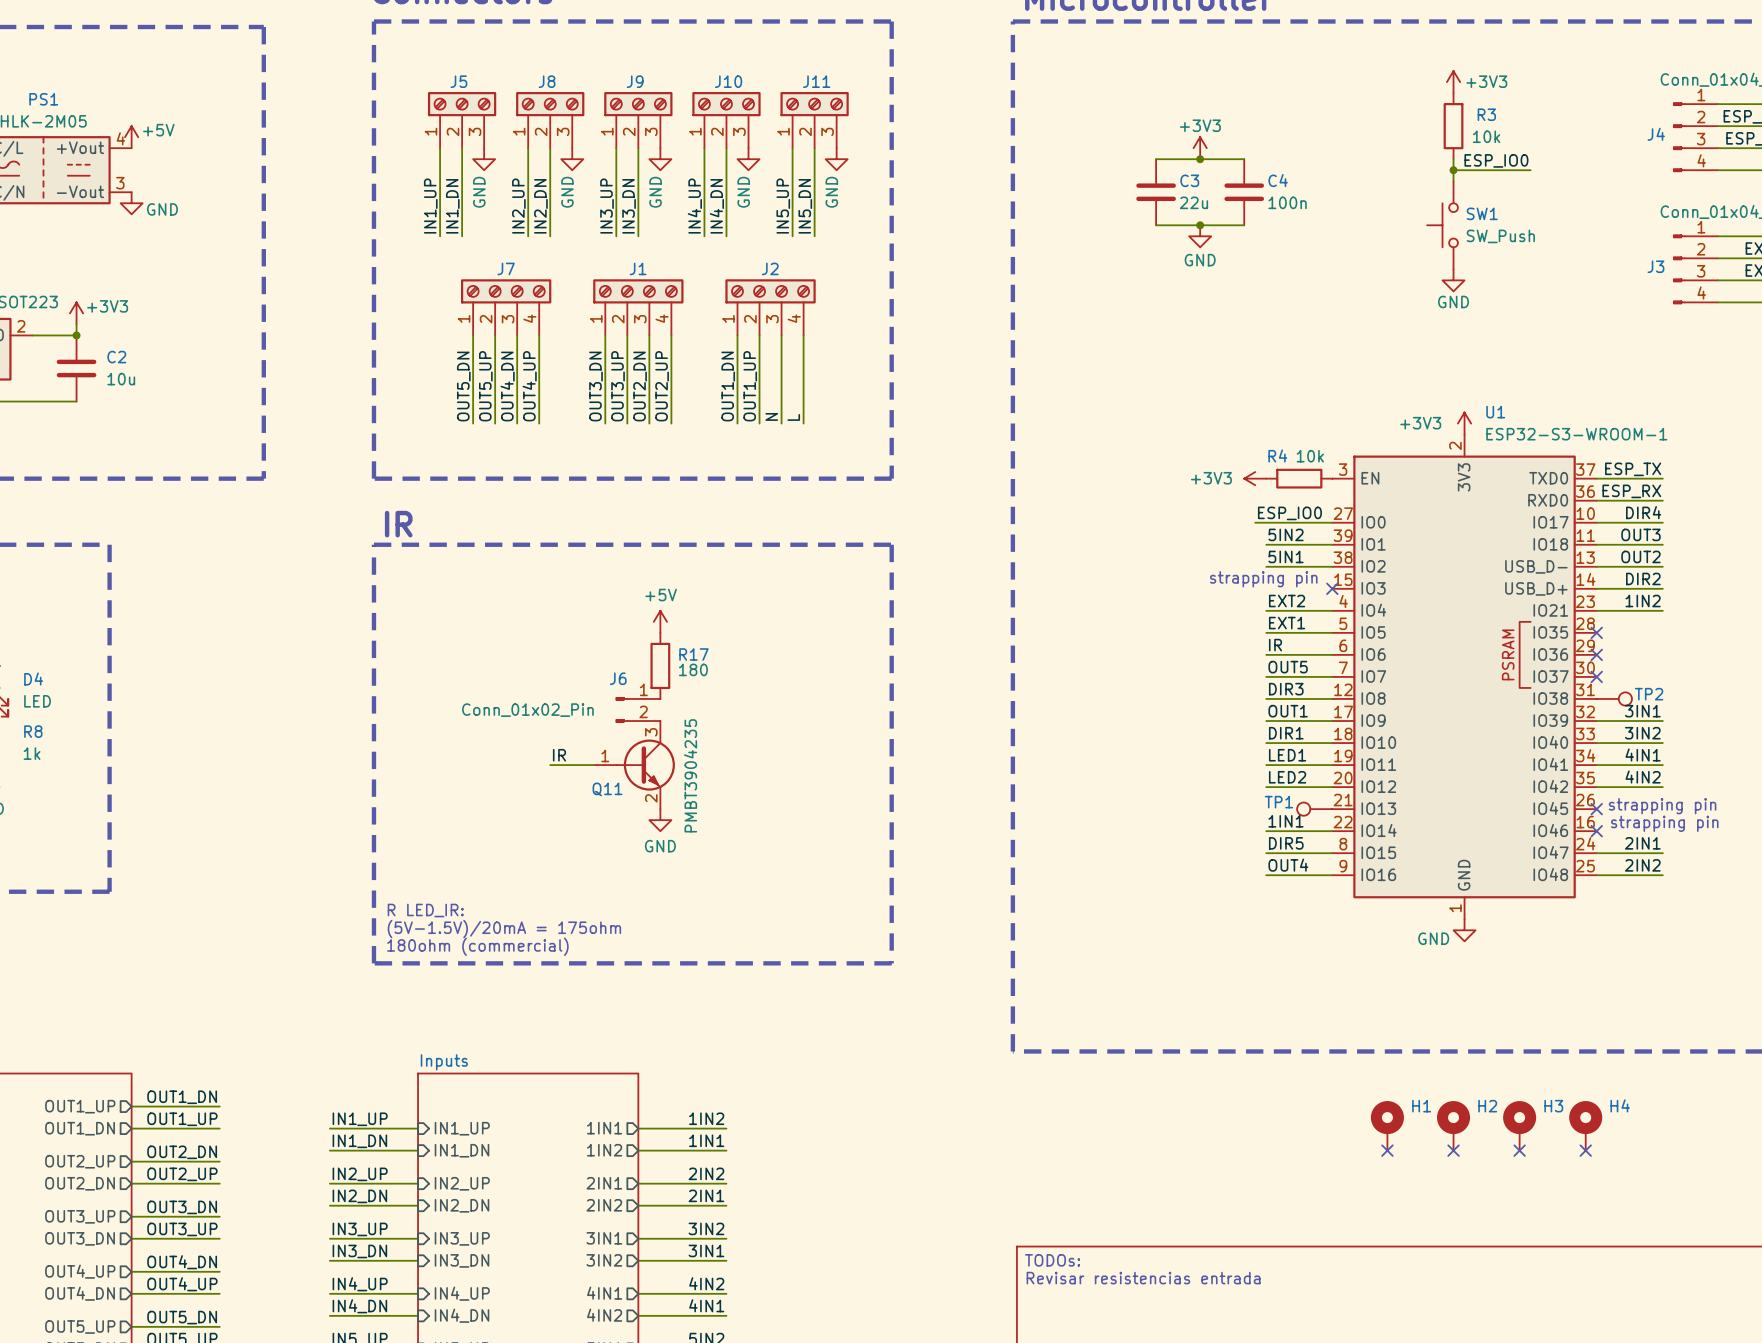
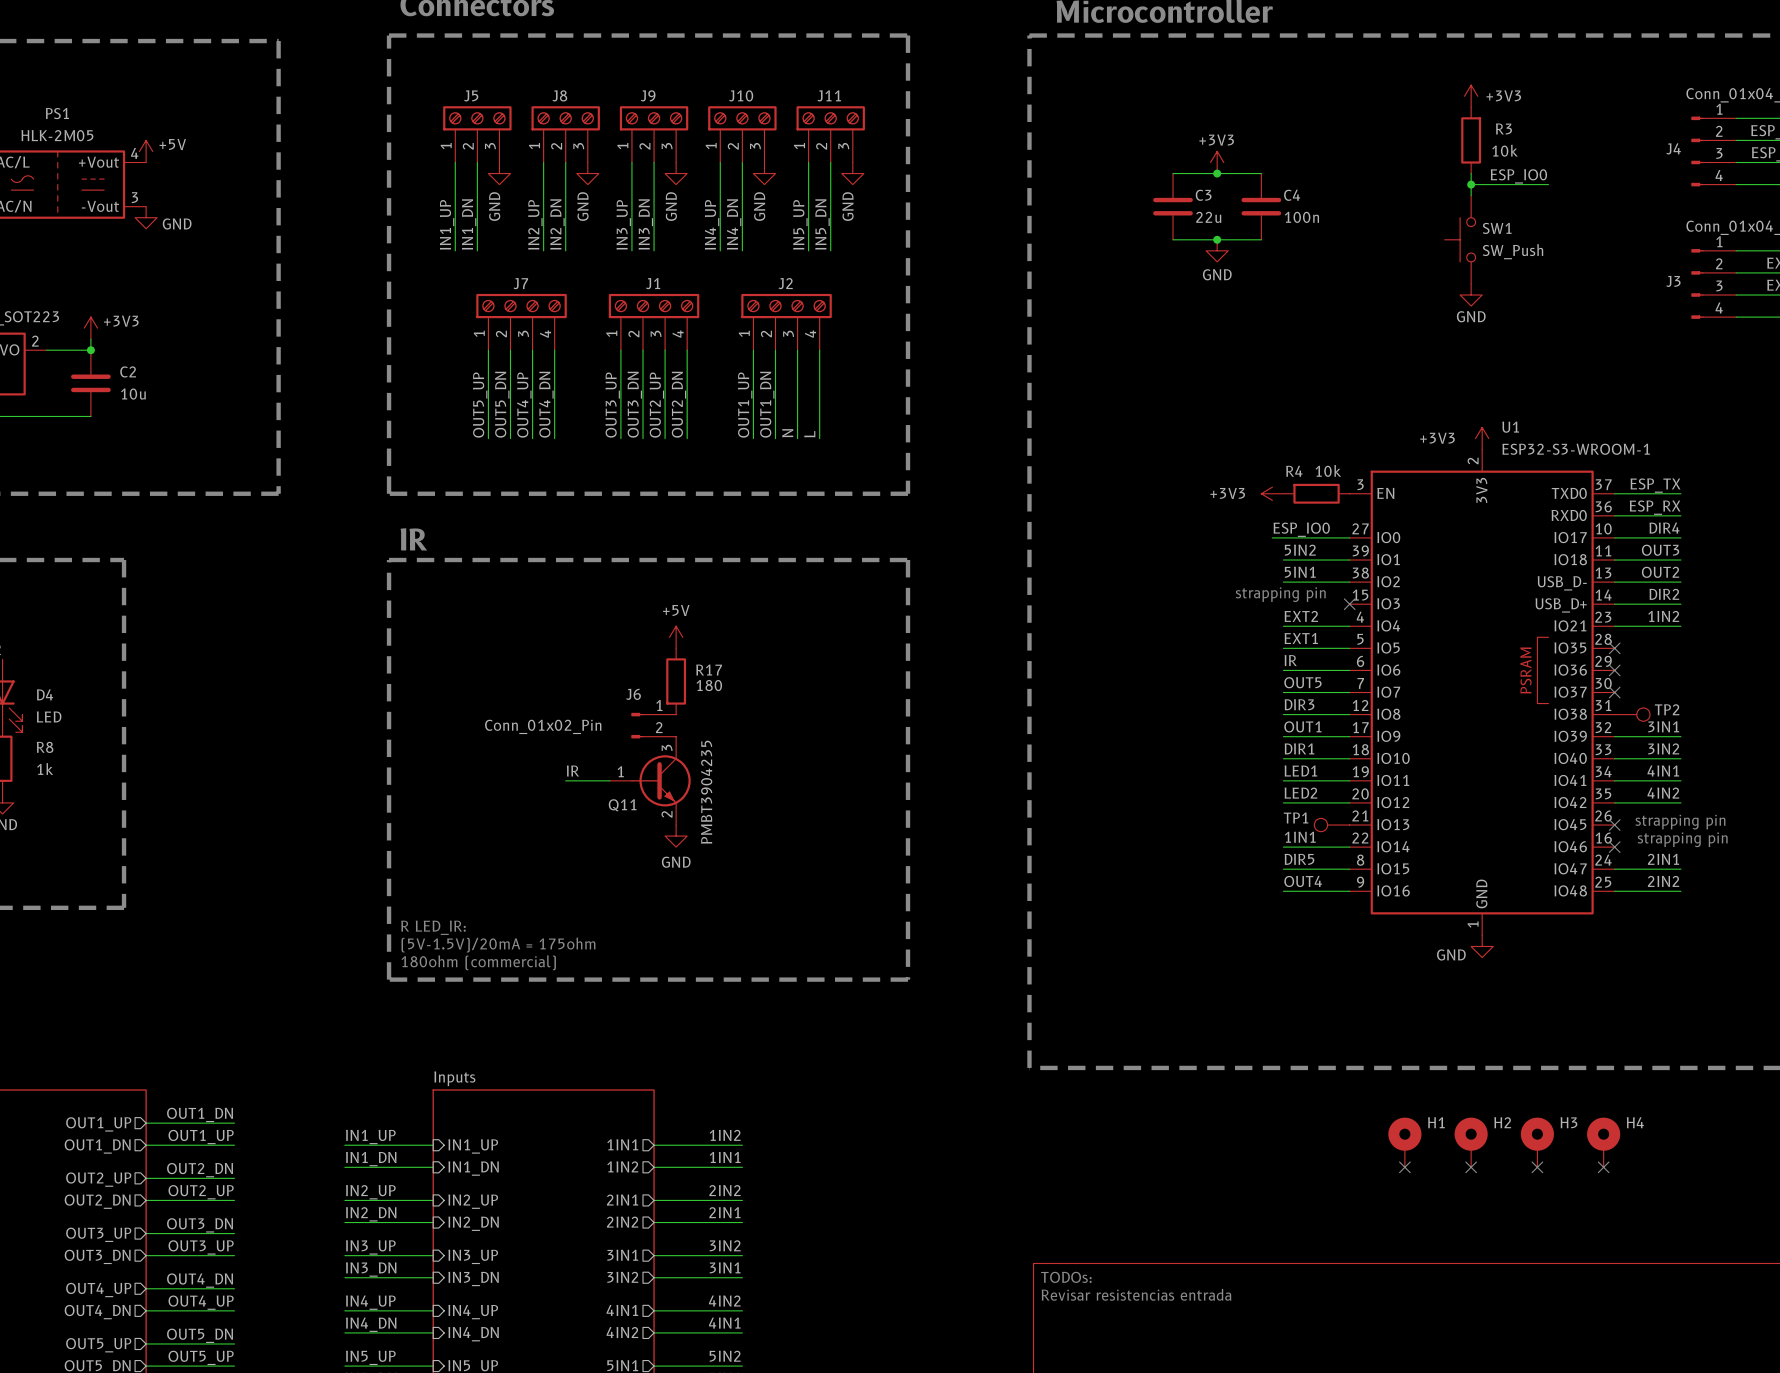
label: OUT5_DN (463, 386) -> OUT5_UP (480, 405)
label: OUT5_UP (485, 386) -> OUT5_DN (502, 404)
label: OUT4_DN (507, 386) -> OUT4_UP (524, 405)
label: OUT4_UP (529, 386) -> OUT4_DN (546, 404)
label: OUT3_DN (595, 386) -> OUT3_UP (612, 405)
label: OUT3_UP (618, 386) -> OUT3_DN (634, 404)
label: OUT2_DN (640, 386) -> OUT2_UP (656, 405)
label: OUT2_UP (662, 386) -> OUT2_DN (678, 404)
label: OUT1_DN (728, 386) -> OUT1_UP (745, 405)
label: OUT1_UP (750, 386) -> OUT1_DN (767, 404)

